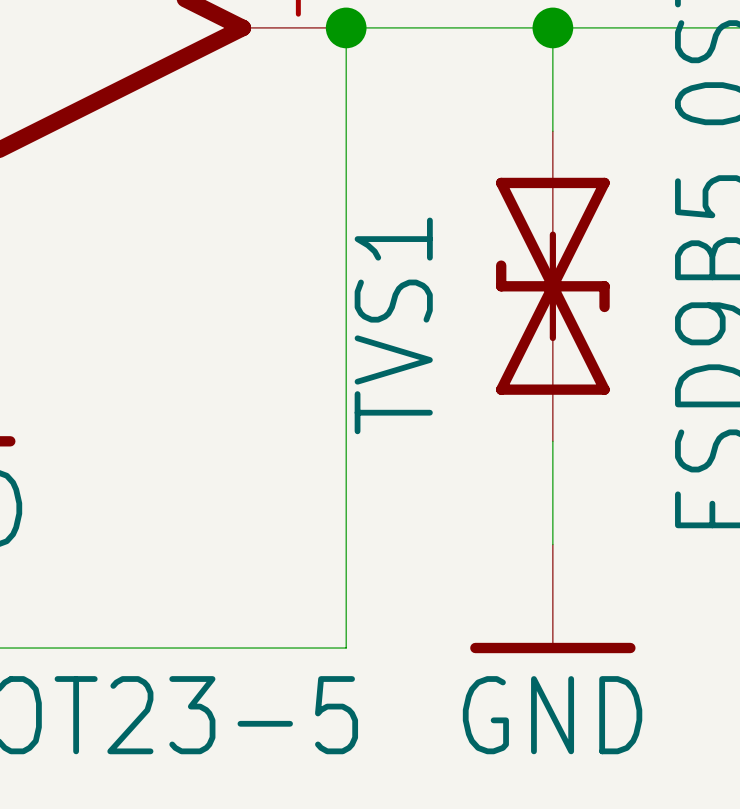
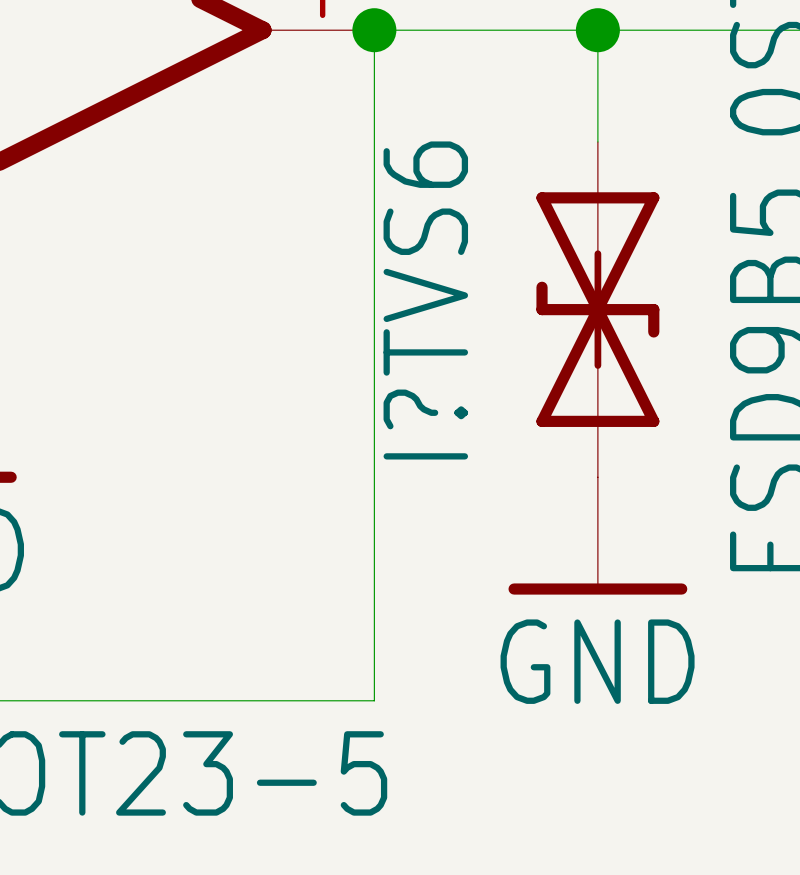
TVS1 name: TVS1 (393, 325) -> I?TVS6 (425, 300)
power symbol position: GND (552, 598) -> GND (597, 535)

